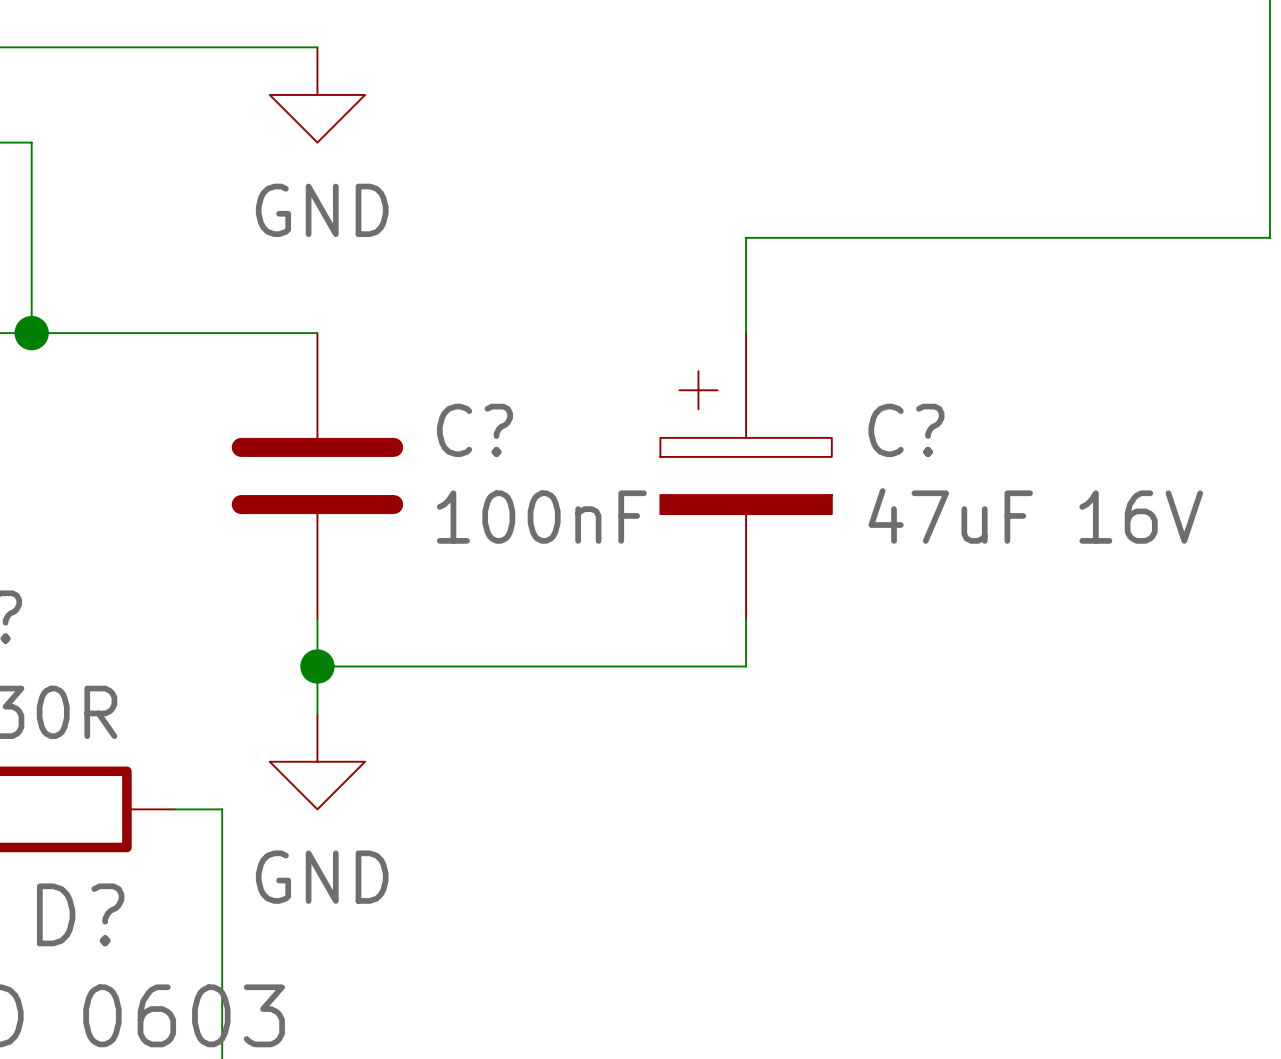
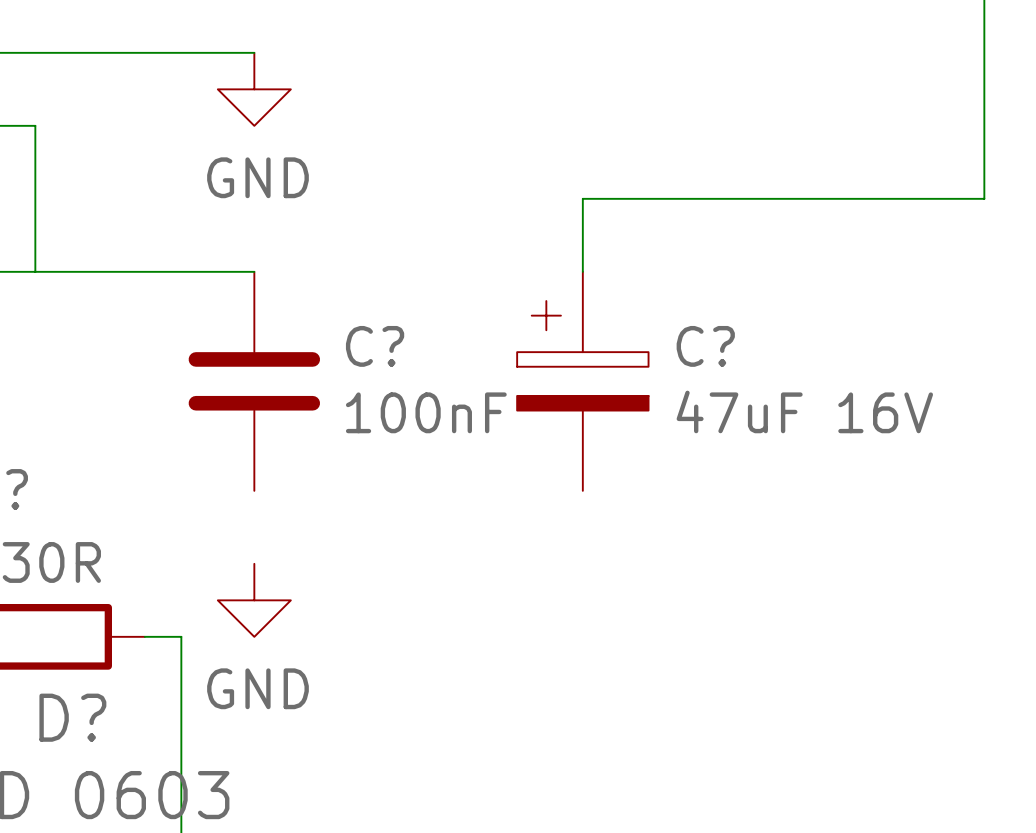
junction: (31, 333) -> none
wire: (317, 618) (317, 714) -> none
wire: (746, 618) (746, 666) (317, 666) -> none
junction: (317, 666) -> none

